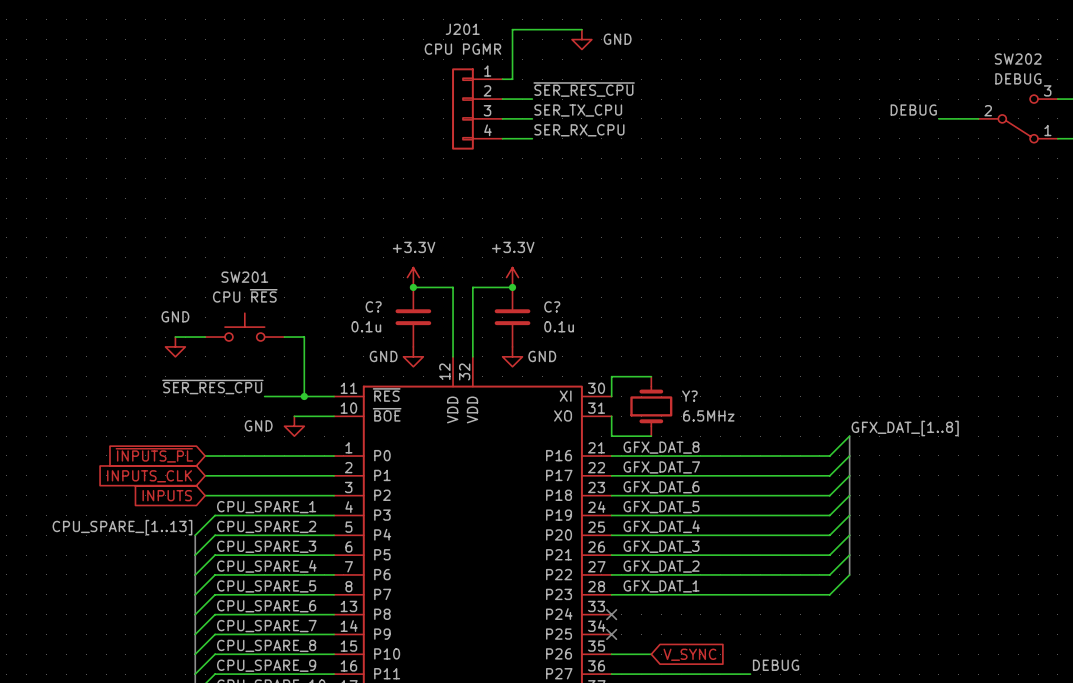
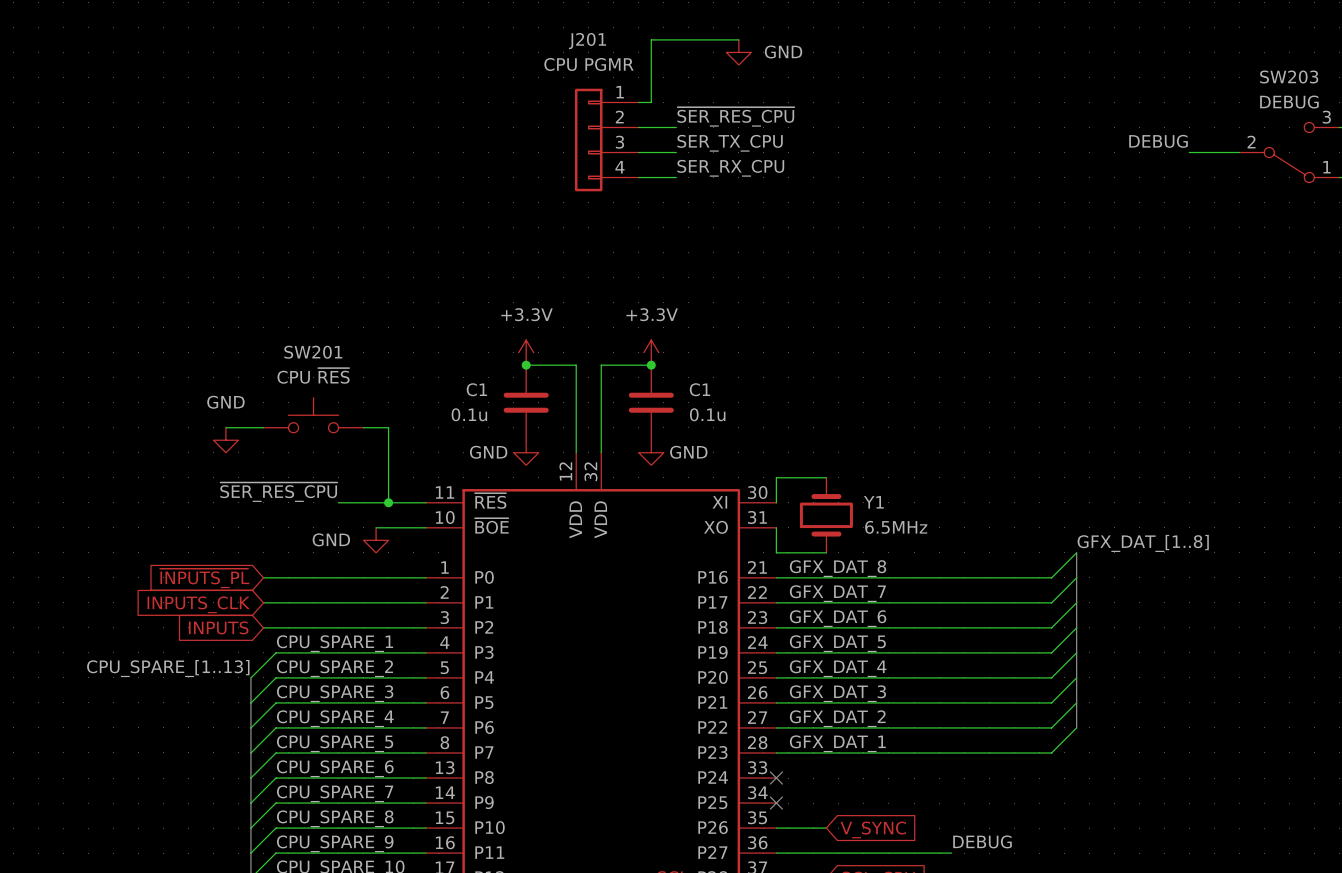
SW202 name: SW202 (1018, 59) -> SW203 (1289, 76)
C? name: C? (373, 306) -> C1 (476, 389)
C? name: C? (552, 306) -> C1 (699, 389)
Y? name: Y? (689, 396) -> Y1 (873, 502)

